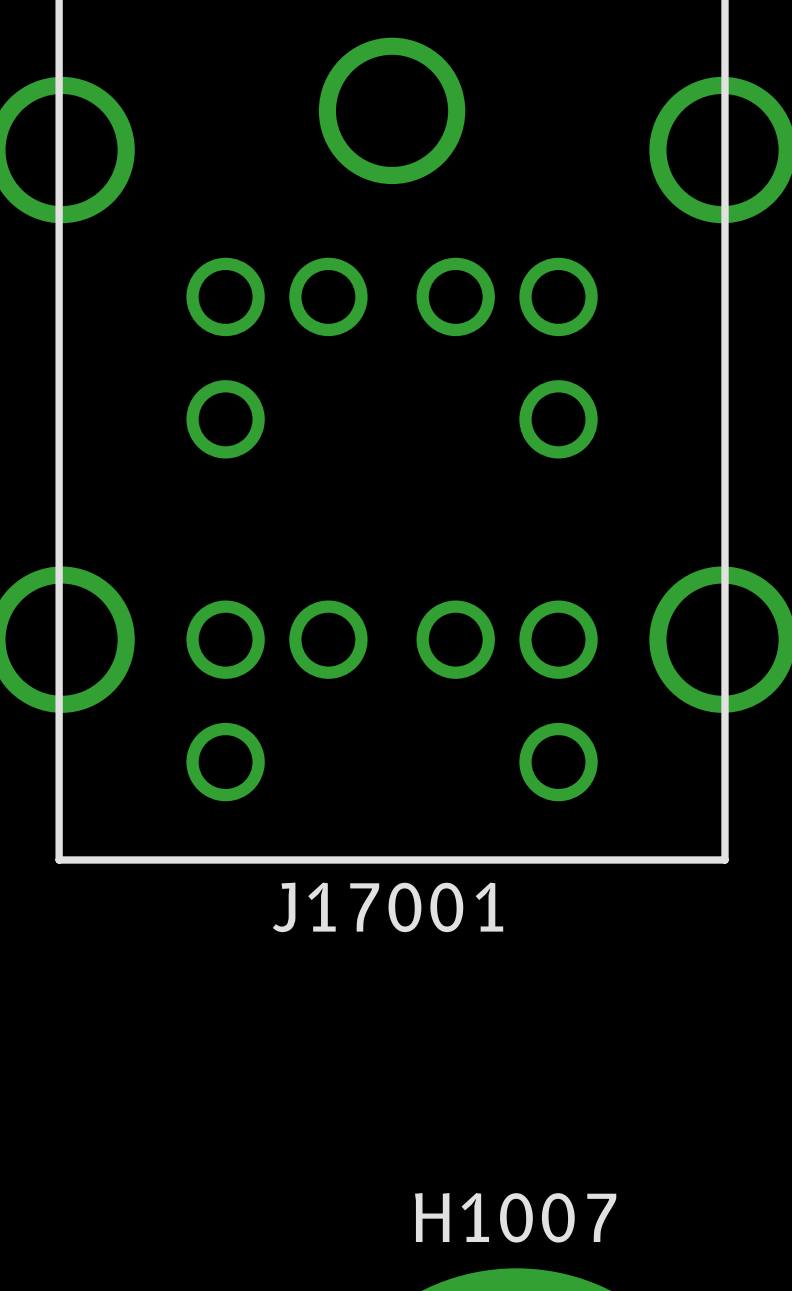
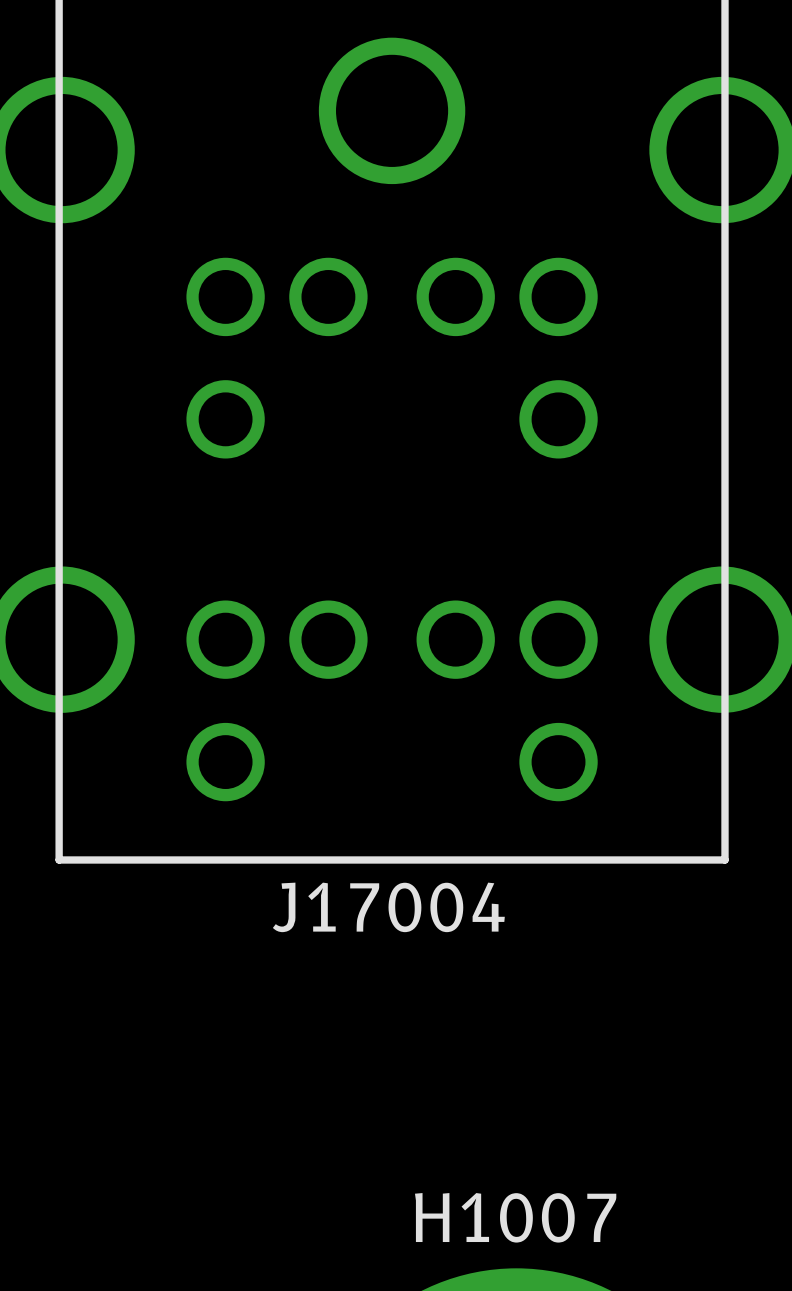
J17001 name: J17001 (388, 907) -> J17004 (388, 907)

